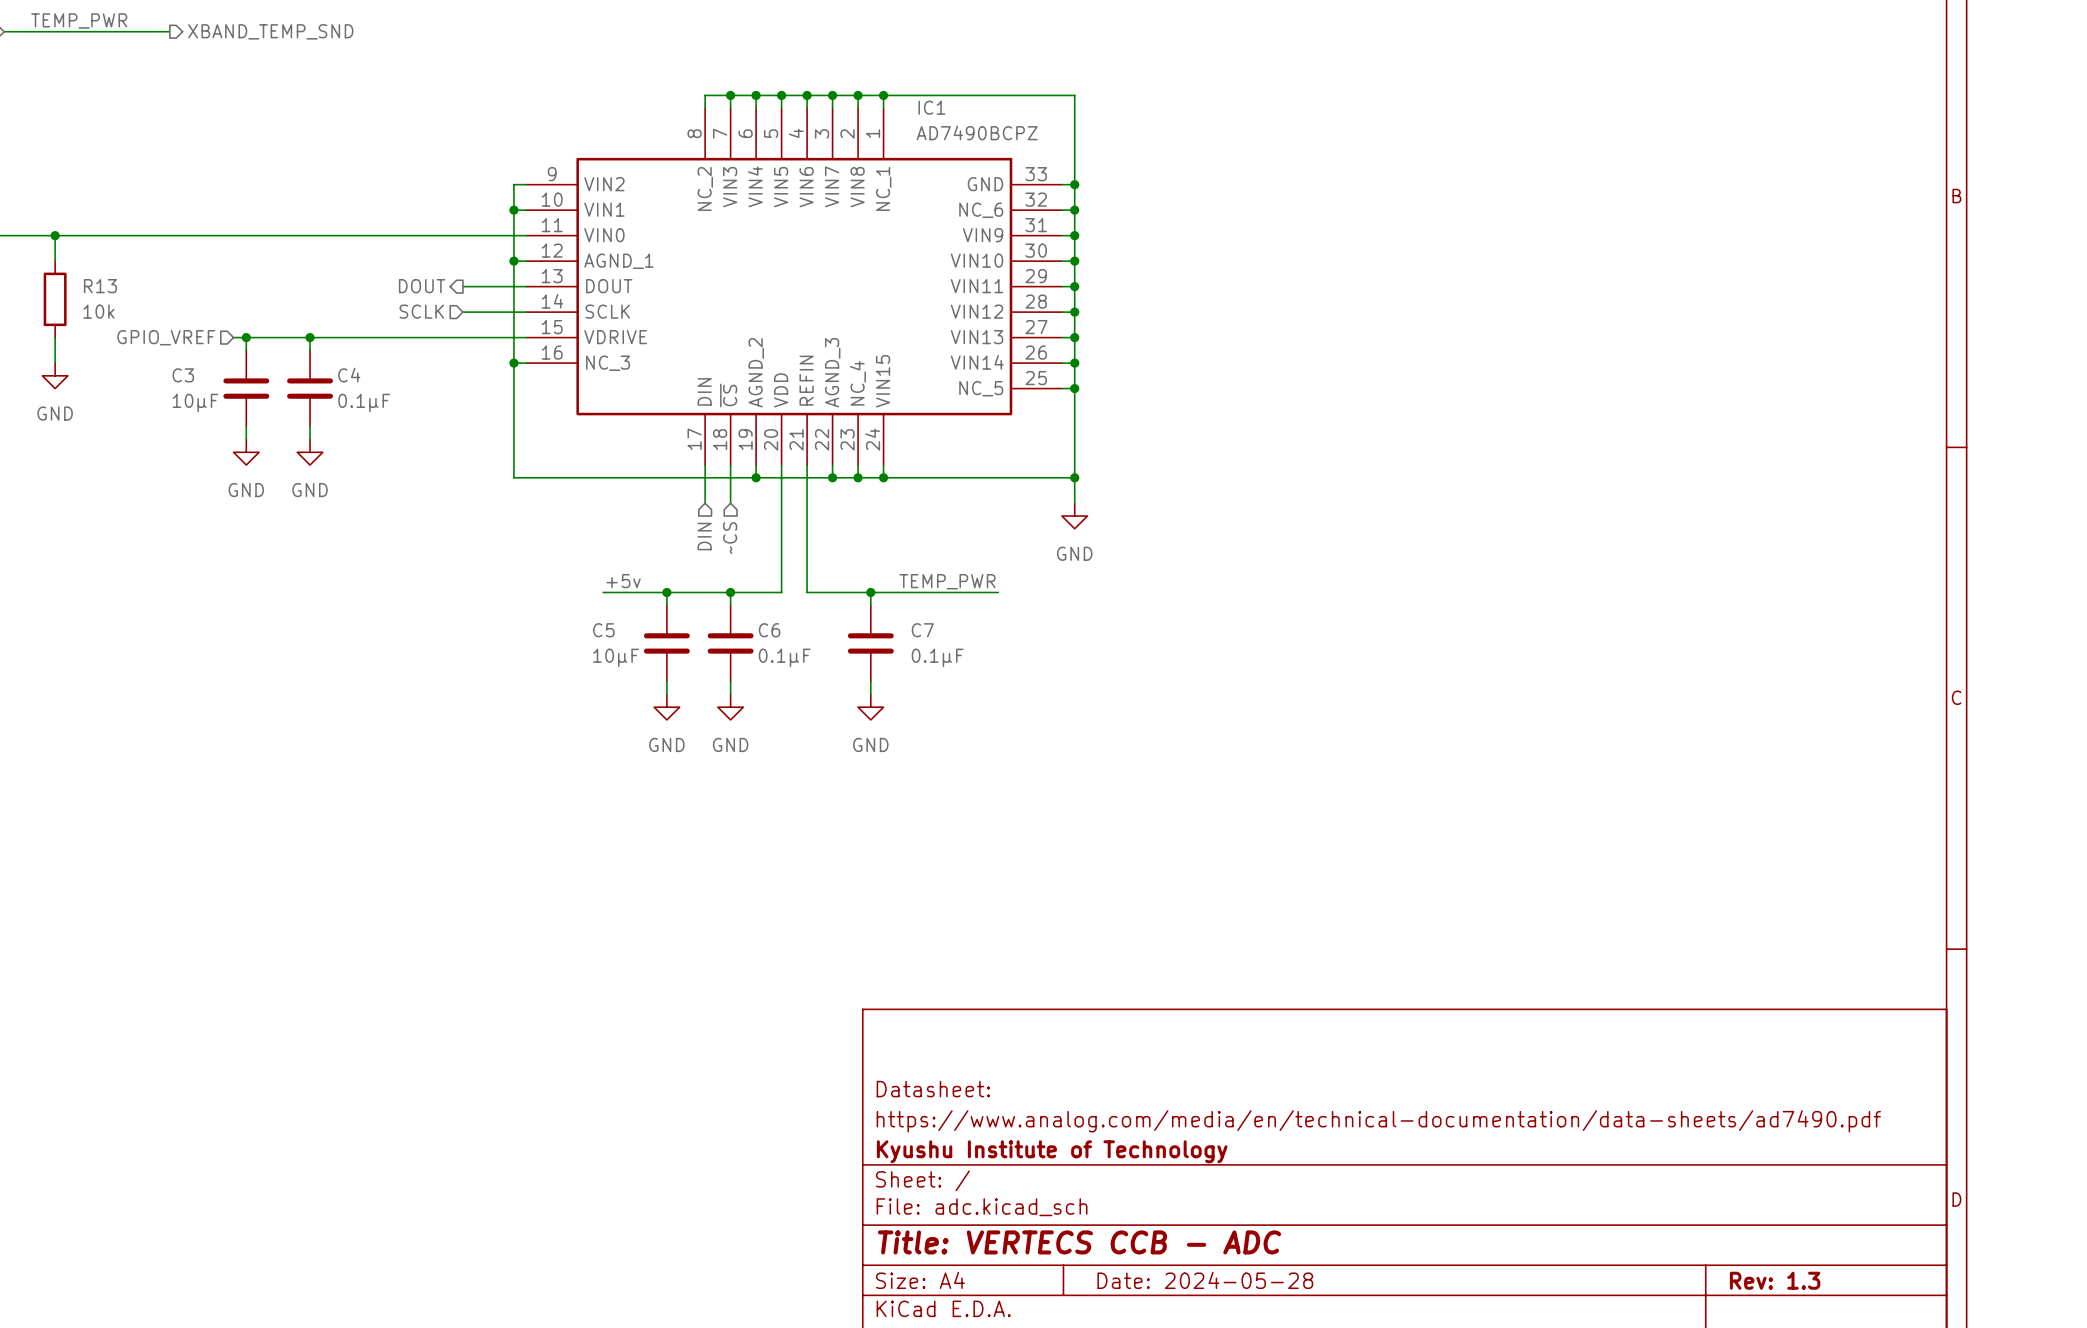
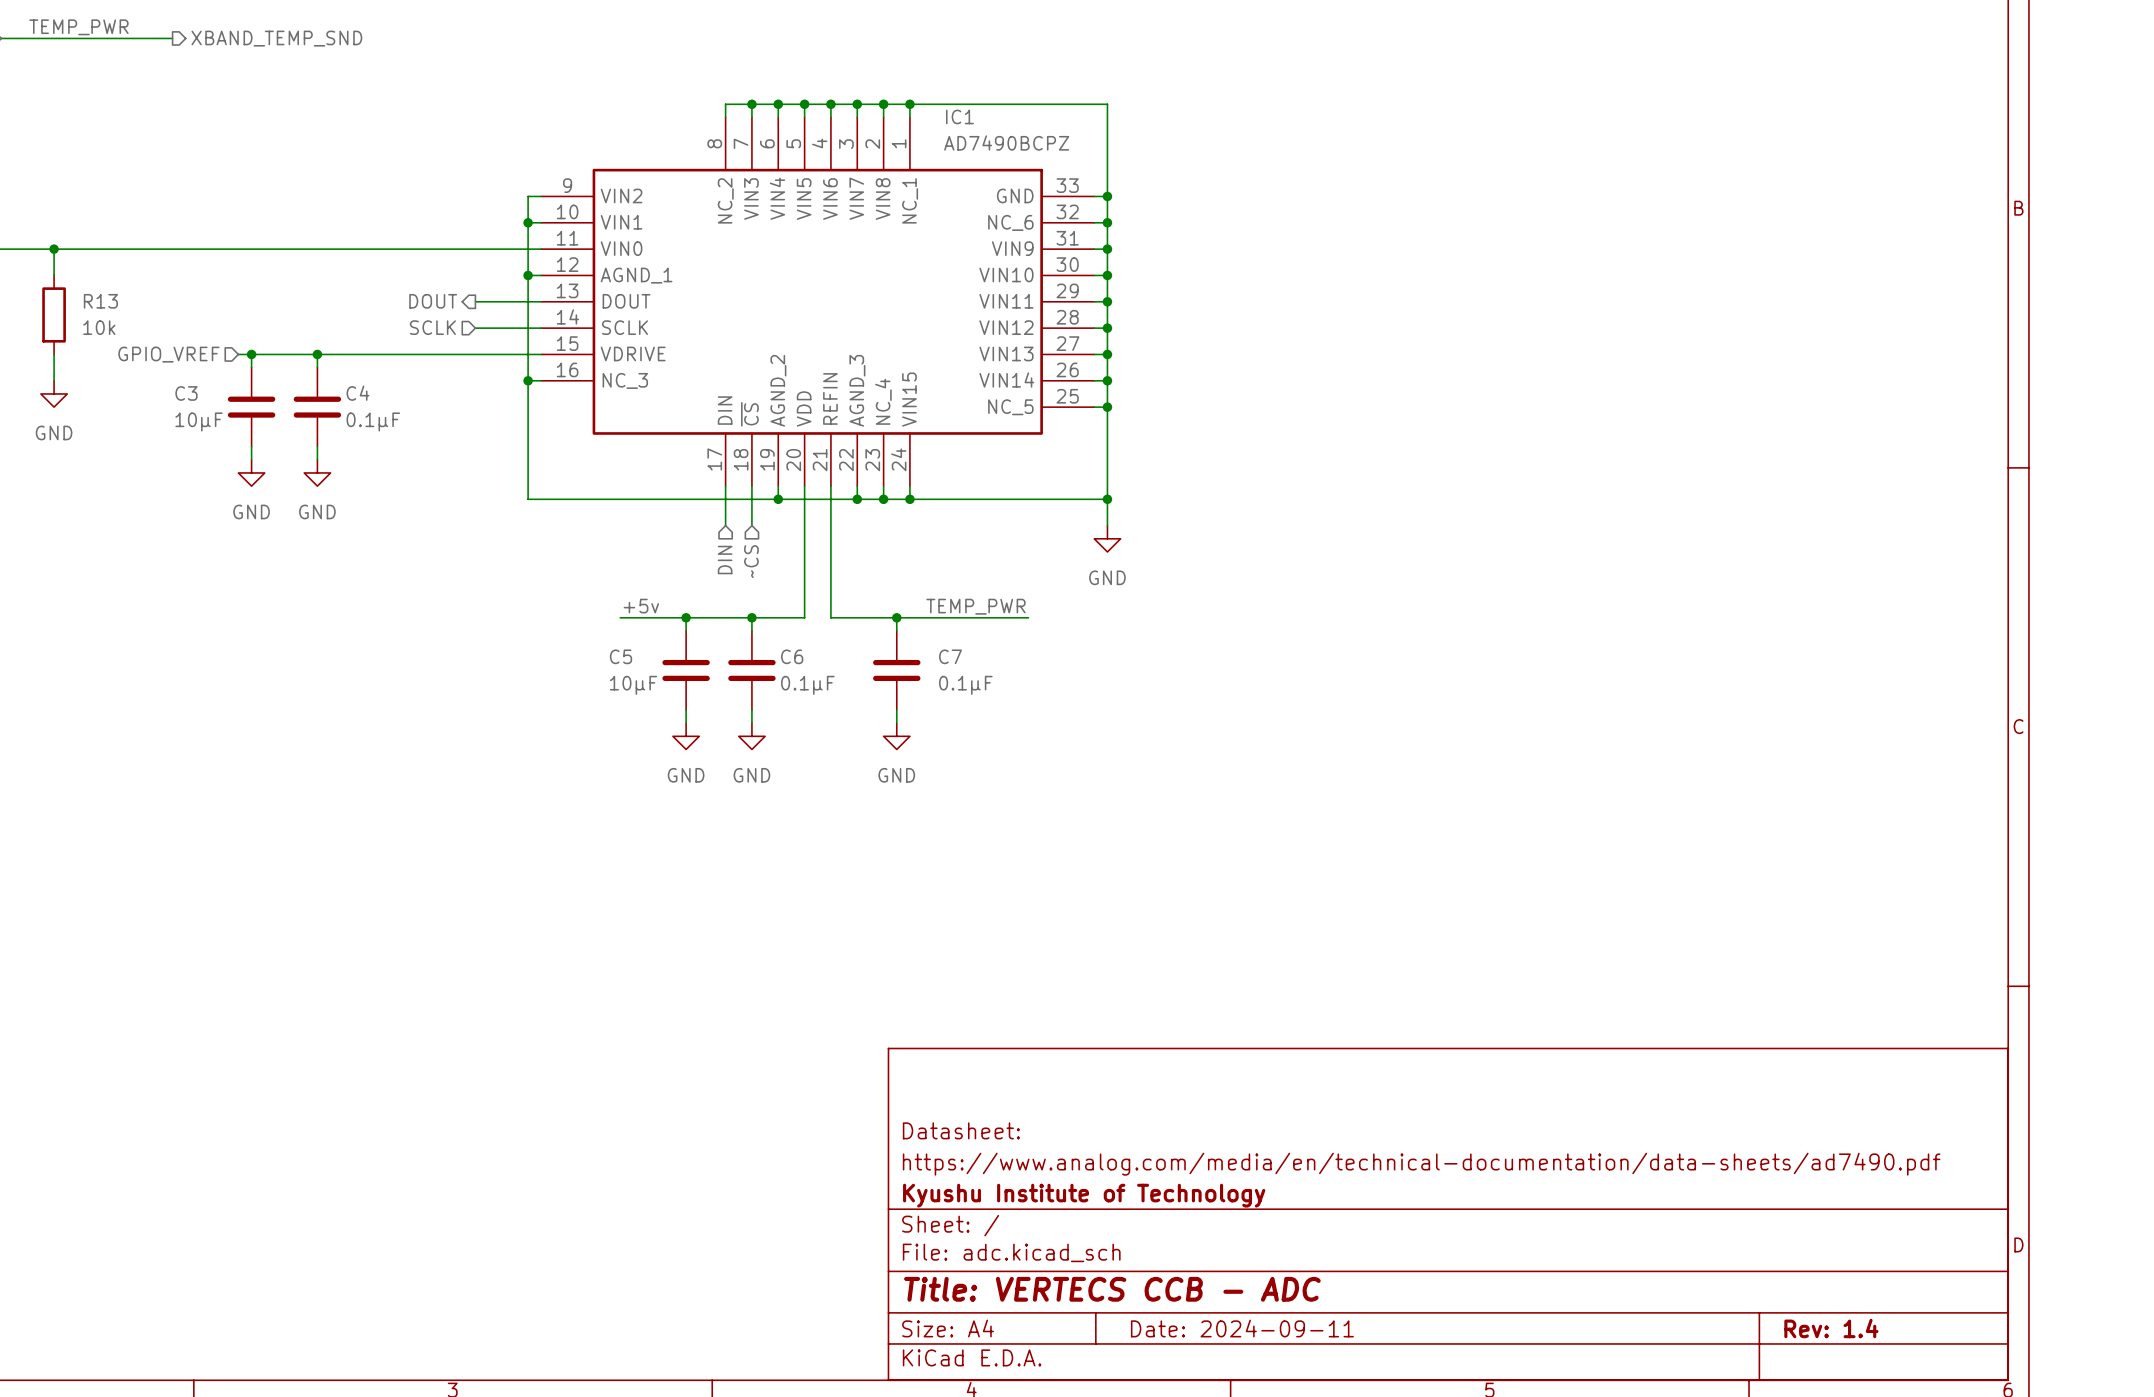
title block: Date: 2024-05-28 (1205, 1280) -> Date: 2024-09-11 (1242, 1328)
title block: Rev: 1.3 (1775, 1280) -> Rev: 1.4 (1831, 1328)

